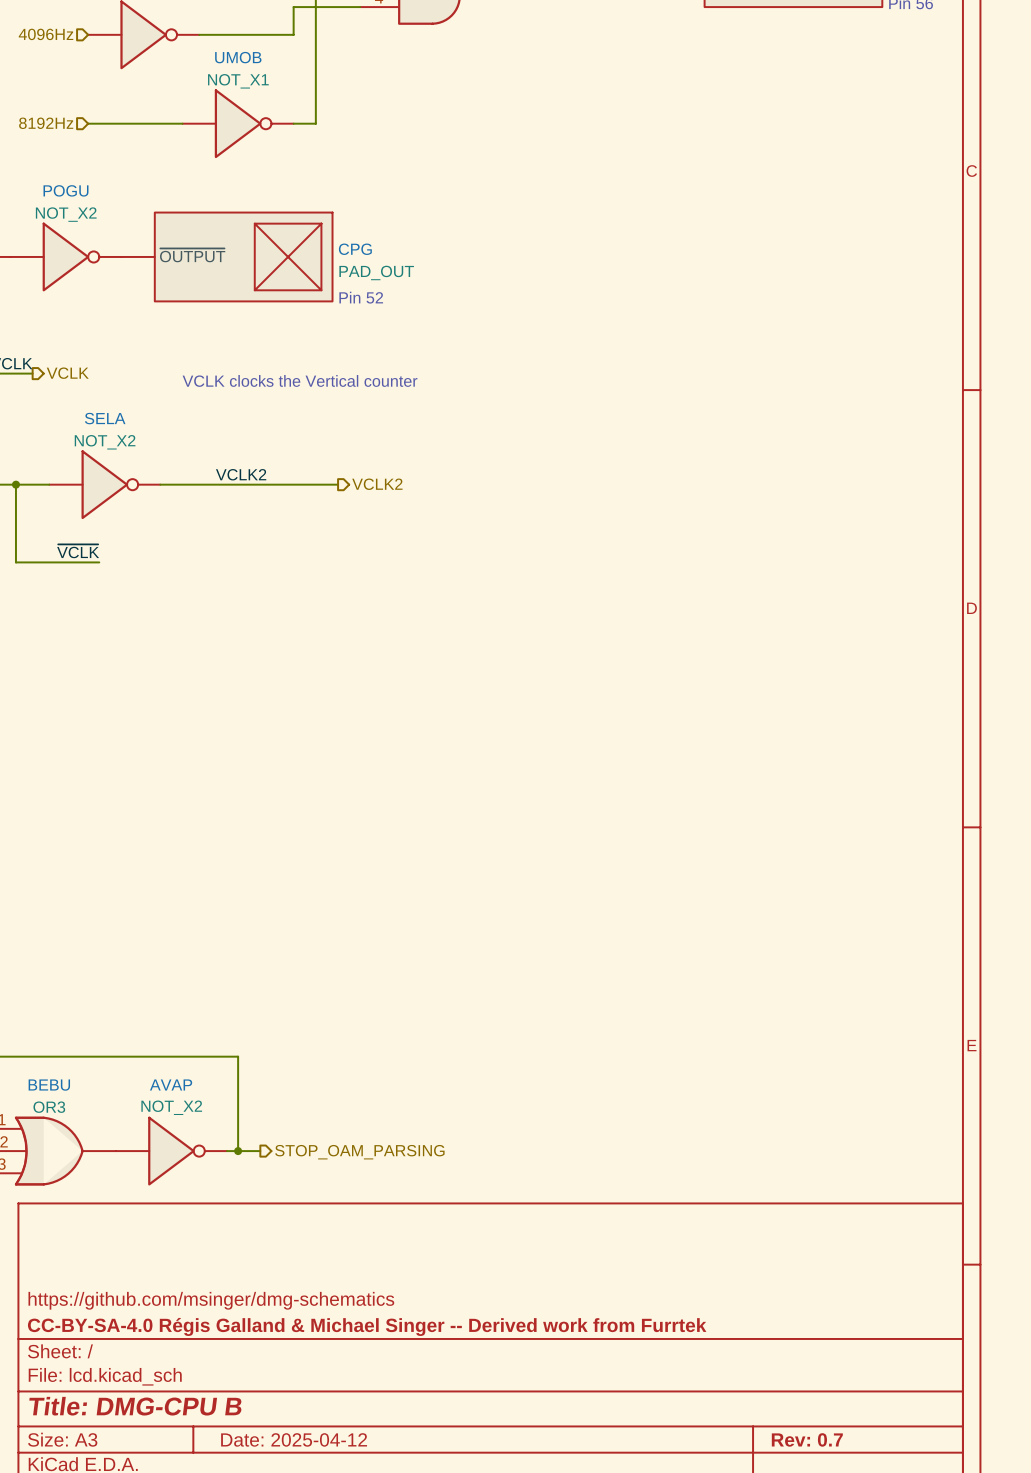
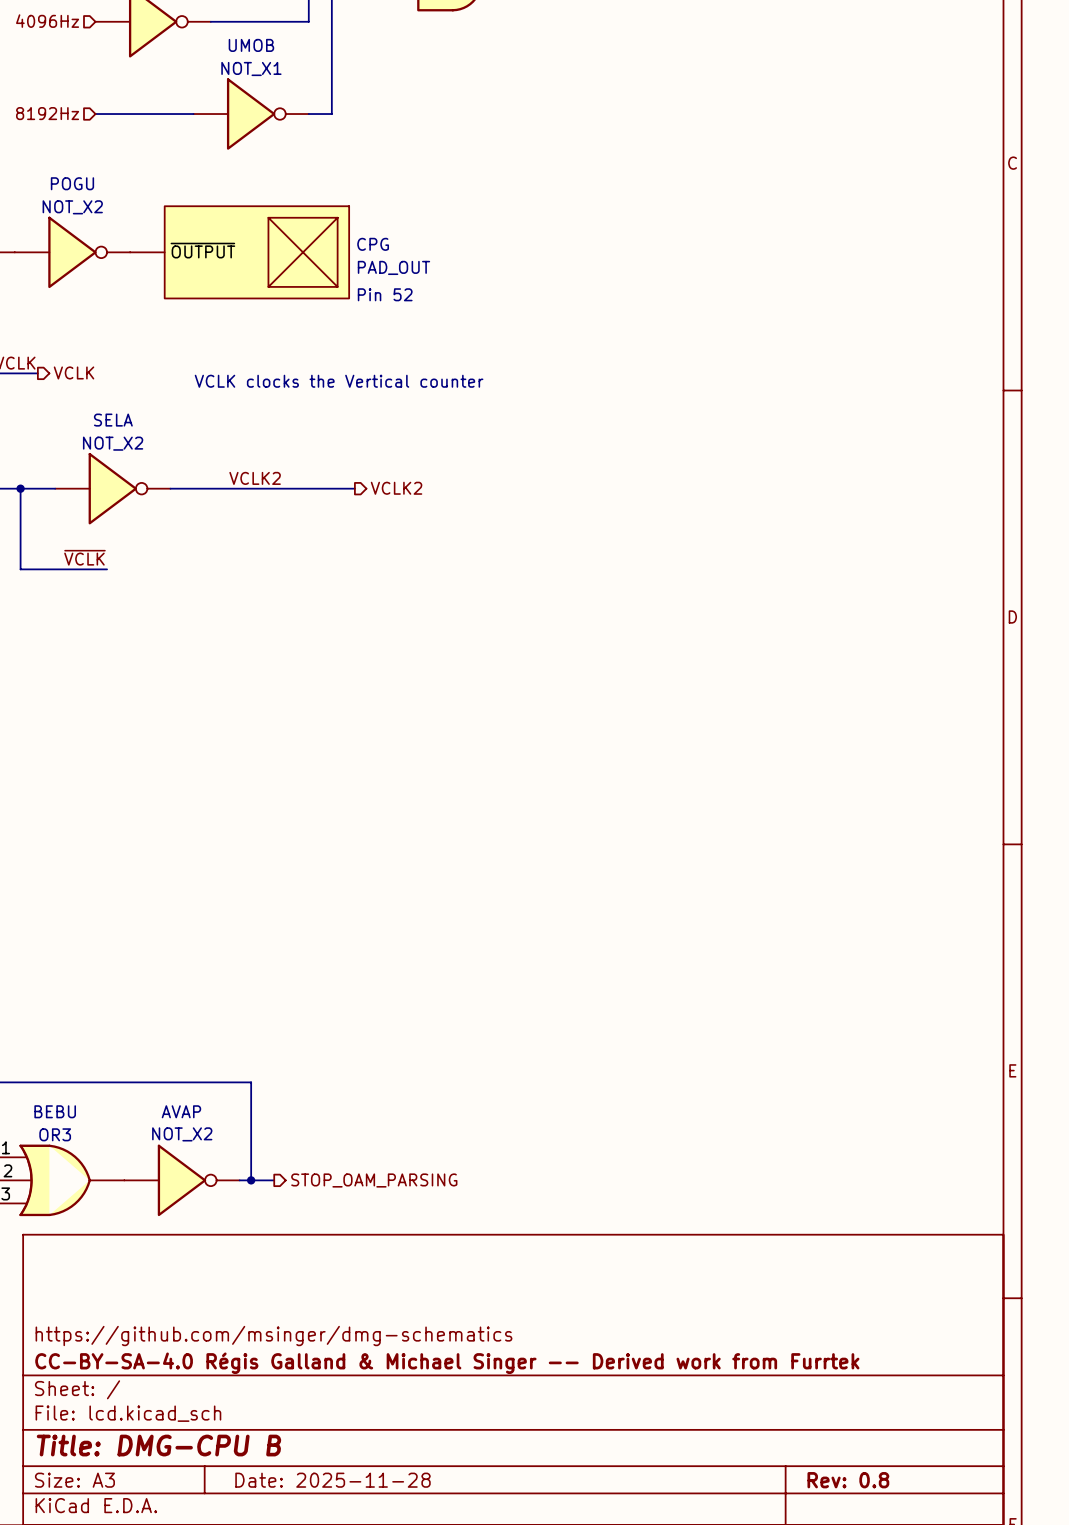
title block: Date: 2025-04-12 (294, 1439) -> Date: 2025-11-28 (332, 1480)
title block: Rev: 0.7 (807, 1439) -> Rev: 0.8 (848, 1480)

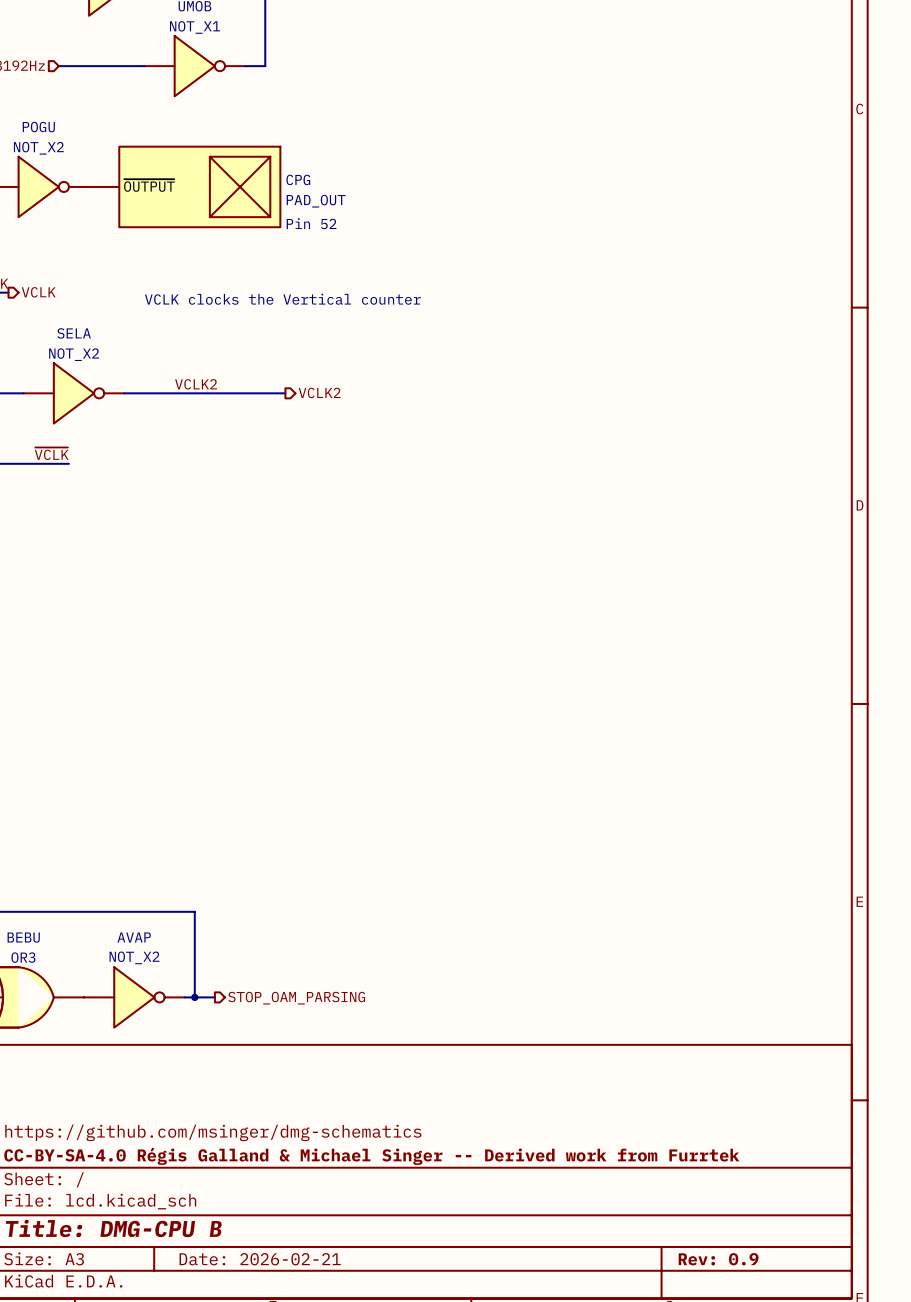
title block: Date: 2025-11-28 (332, 1480) -> Date: 2026-02-21 (260, 1259)
title block: Rev: 0.8 (848, 1480) -> Rev: 0.9 (718, 1259)

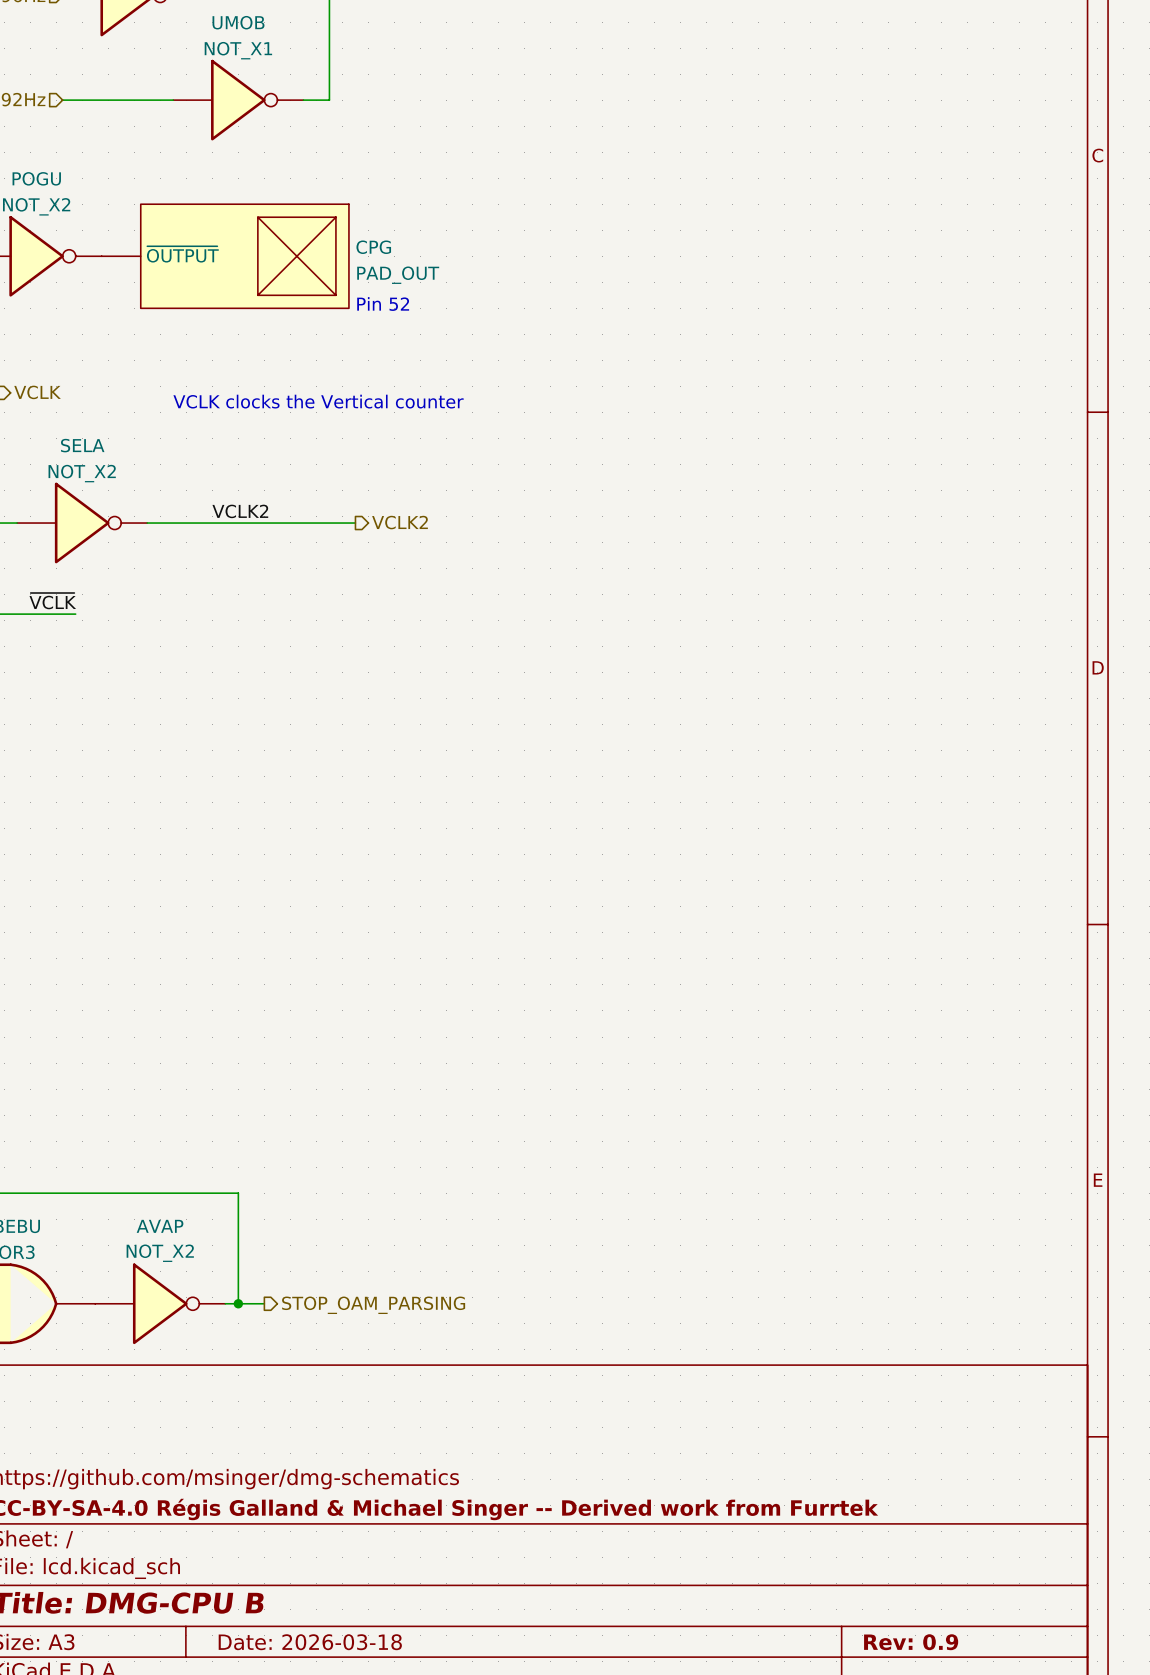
title block: Date: 2026-02-21 (260, 1259) -> Date: 2026-03-18 (310, 1642)

